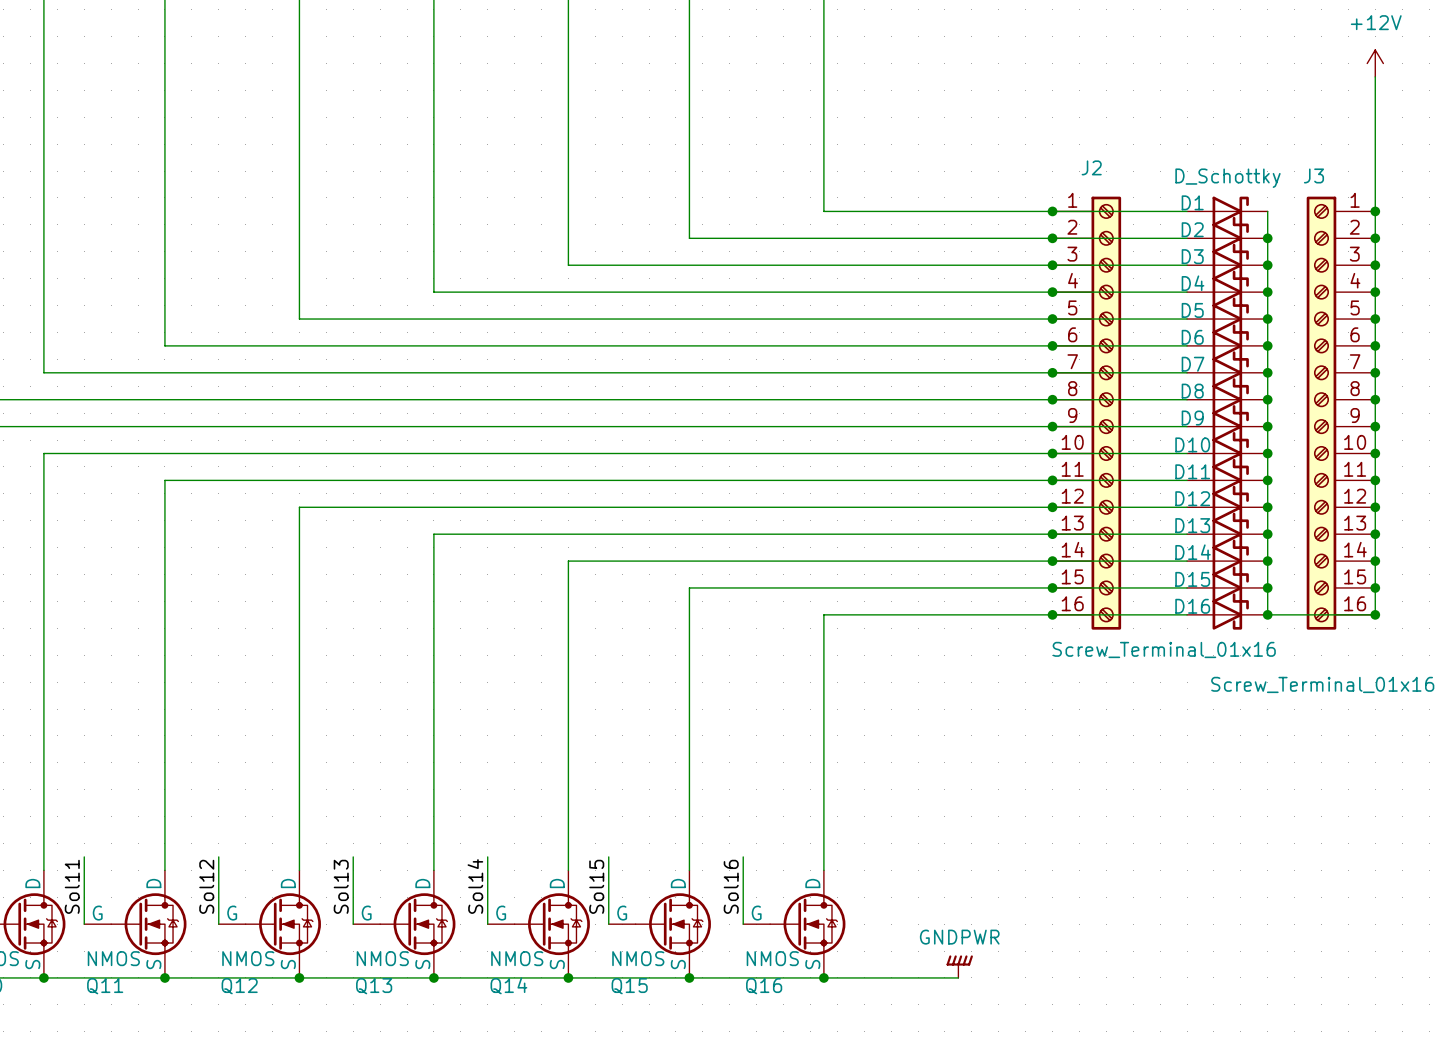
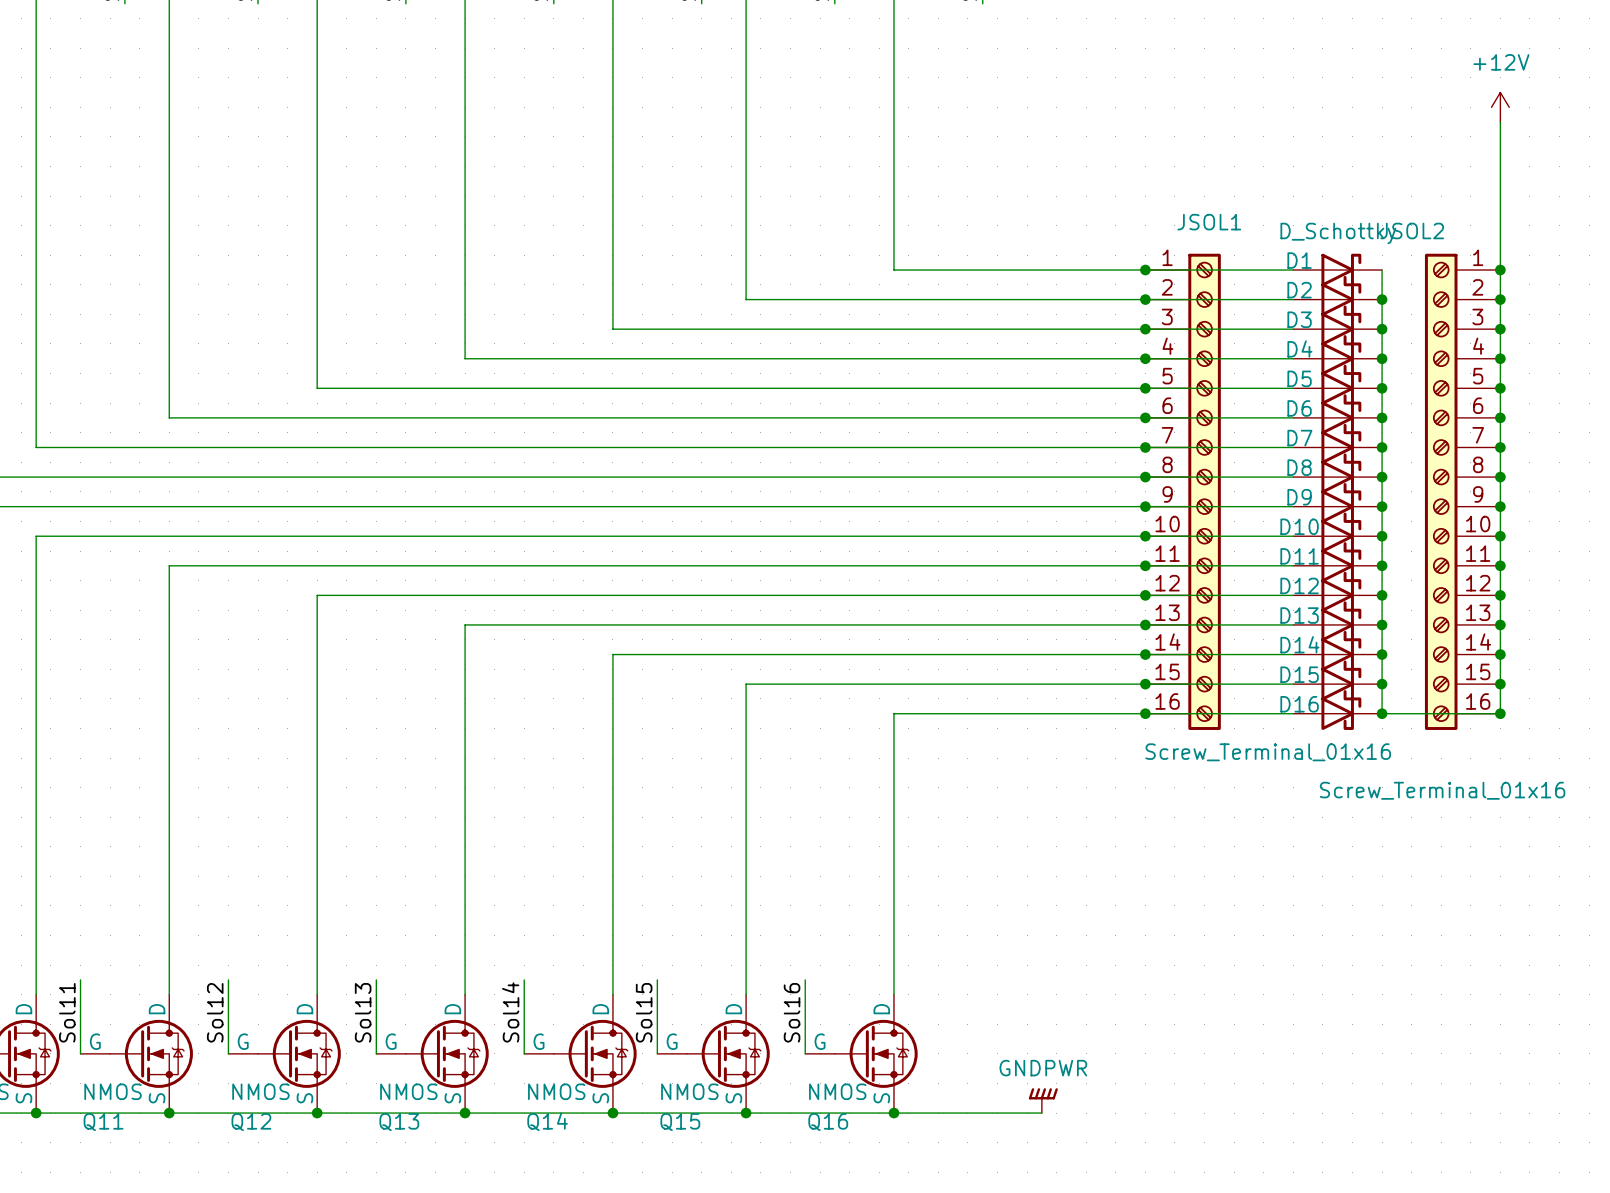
J2 name: J2 (1091, 167) -> JSOL1 (1209, 222)
J3 name: J3 (1313, 175) -> JSOL2 (1412, 231)

